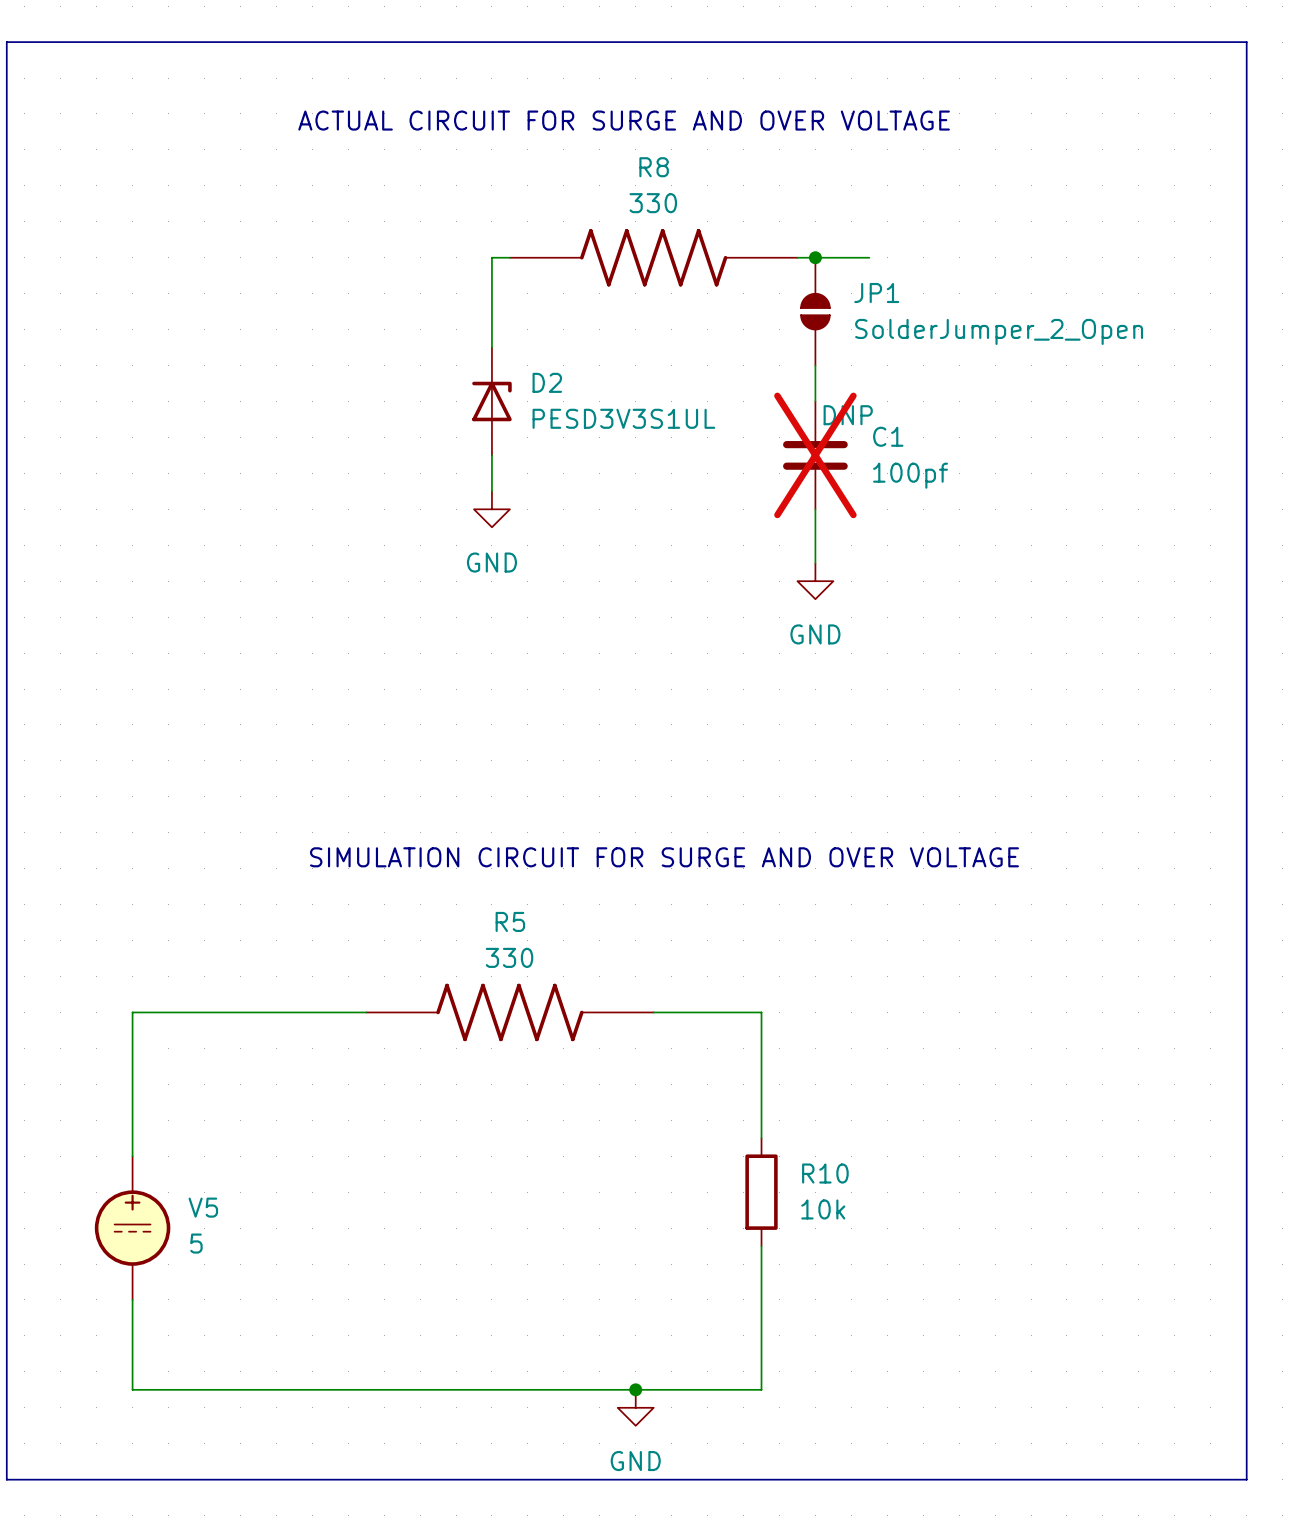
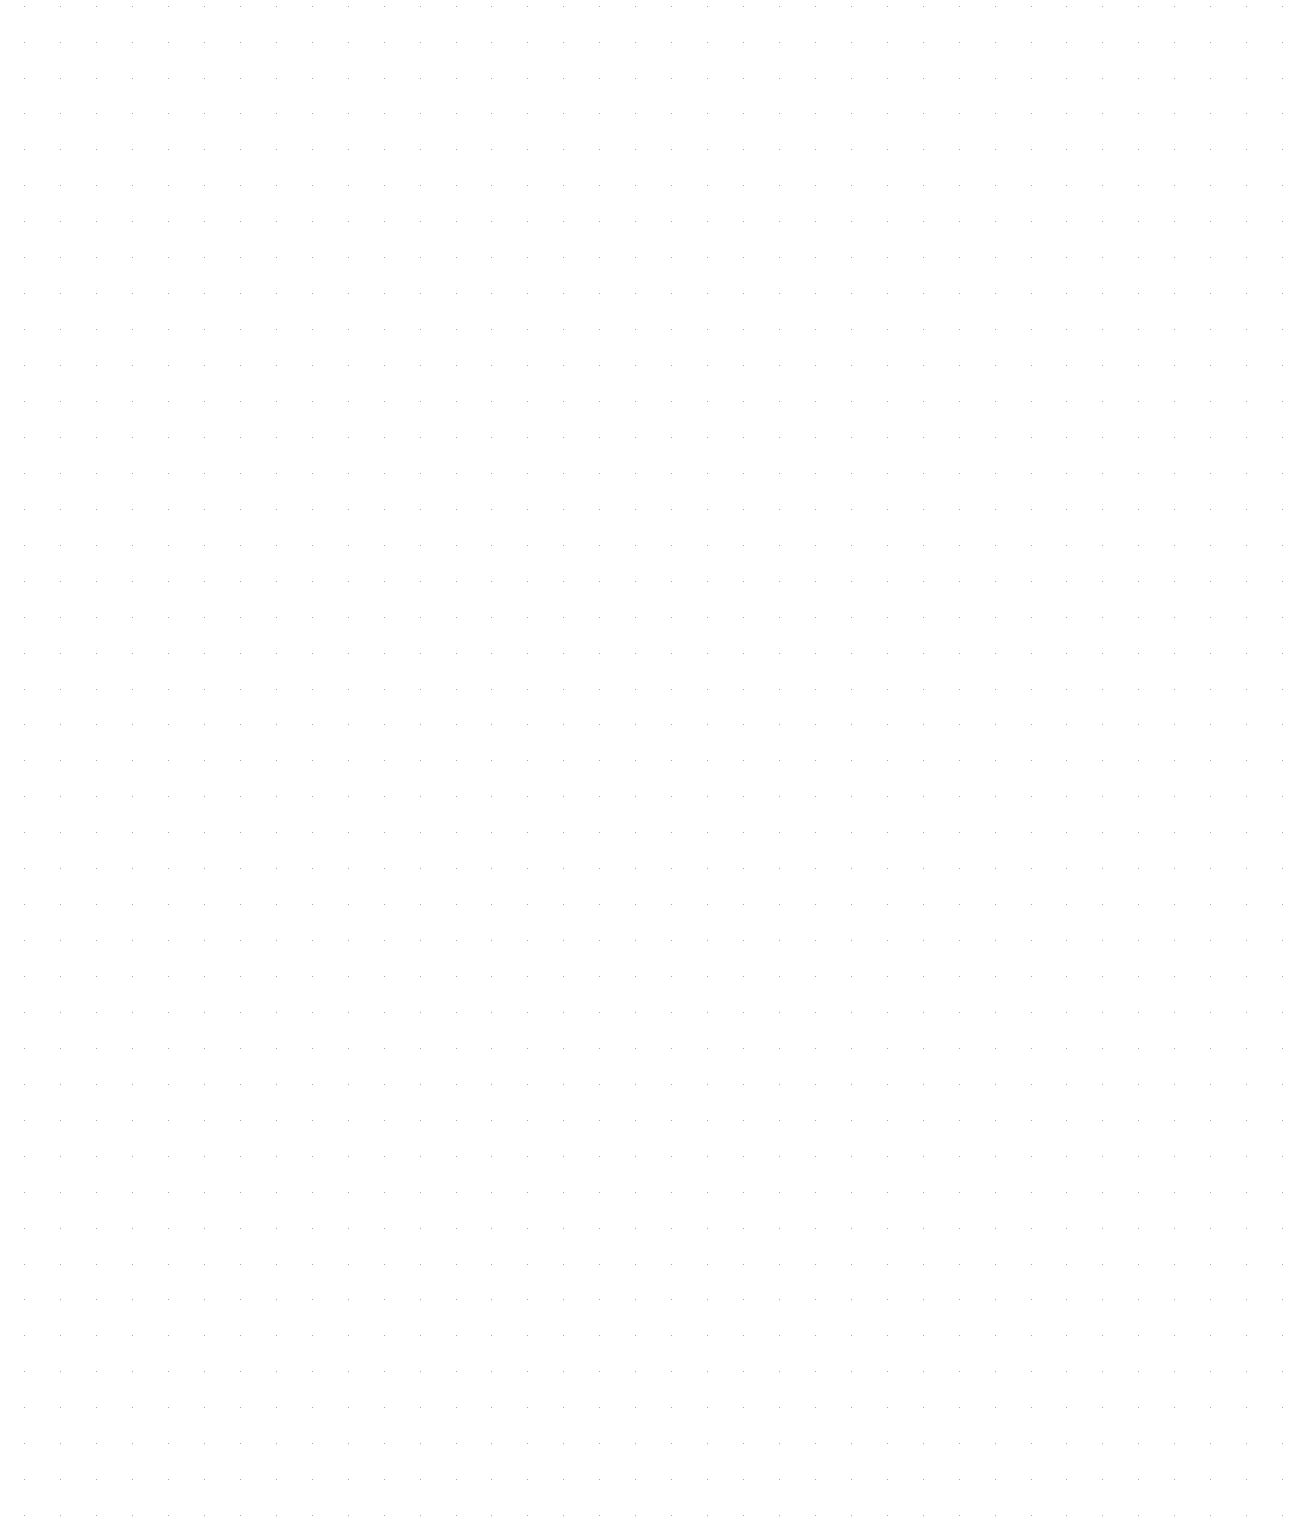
line: (6, 42) (1246, 42) (1246, 1479) (6, 1479) (6, 42) -> none
text: ACTUAL CIRCUIT FOR SURGE AND OVER VOLTAGE (624, 120) -> none
wire: (509, 257) (491, 257) (491, 347) -> none
R8: 330 (653, 257) -> none
wire: (797, 257) (869, 257) -> none
junction: (815, 257) -> none
JP1: SolderJumper_2_Open (815, 311) -> none
wire: (815, 365) (815, 401) -> none
D2: PESD3V3S1UL (491, 401) -> none
wire: (491, 455) (491, 491) -> none
C1: 100pf (815, 455) -> none
power symbol: GND (491, 509) -> none
wire: (815, 509) (815, 563) -> none
power symbol: GND (815, 581) -> none
text: SIMULATION CIRCUIT FOR SURGE AND OVER VOLTAGE (664, 857) -> none
wire: (366, 1012) (132, 1012) (132, 1156) -> none
R5: 330 (509, 1012) -> none
wire: (653, 1012) (761, 1012) (761, 1138) -> none
R10: 10k (761, 1192) -> none
V5: 5 (132, 1228) -> none
wire: (761, 1246) (761, 1389) (132, 1389) (132, 1299) -> none
junction: (635, 1389) -> none
power symbol: GND (635, 1407) -> none

